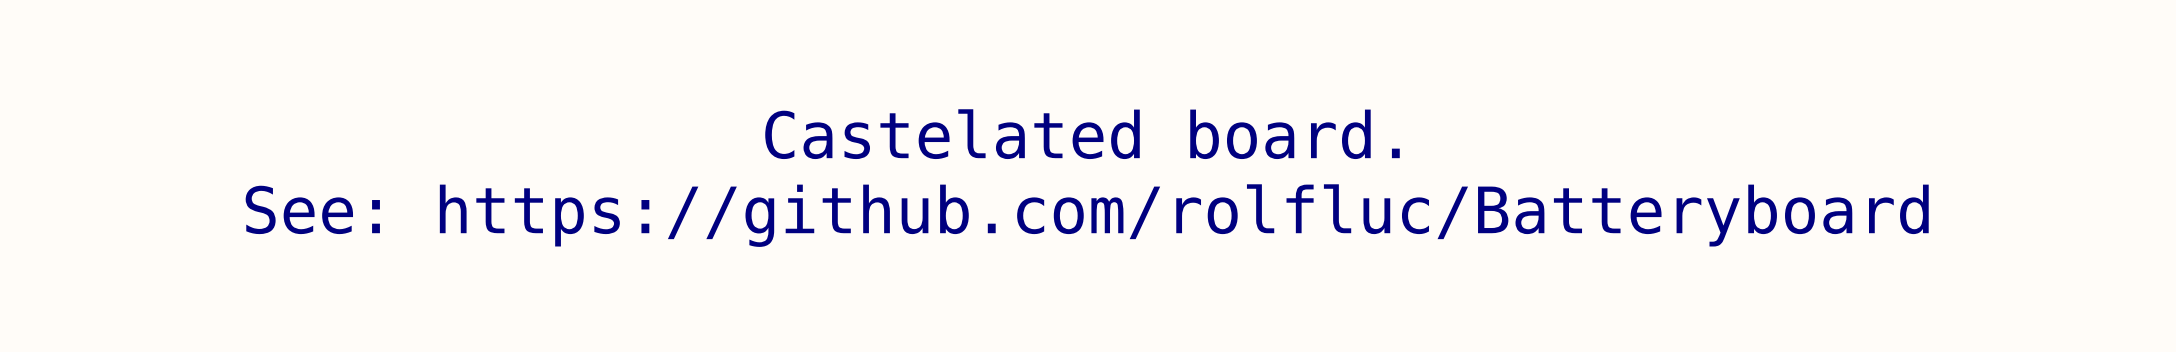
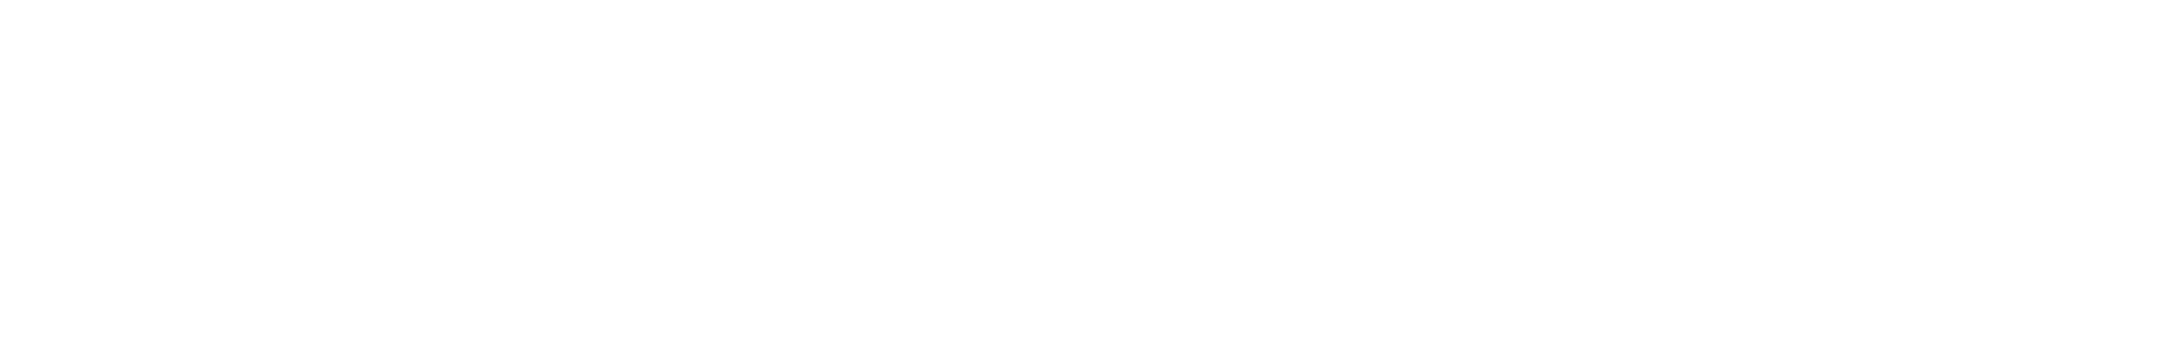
text: Castelated board. (1082, 134) -> none
text: See: https://github.com/rolfluc/Batteryboard (1087, 215) -> none

